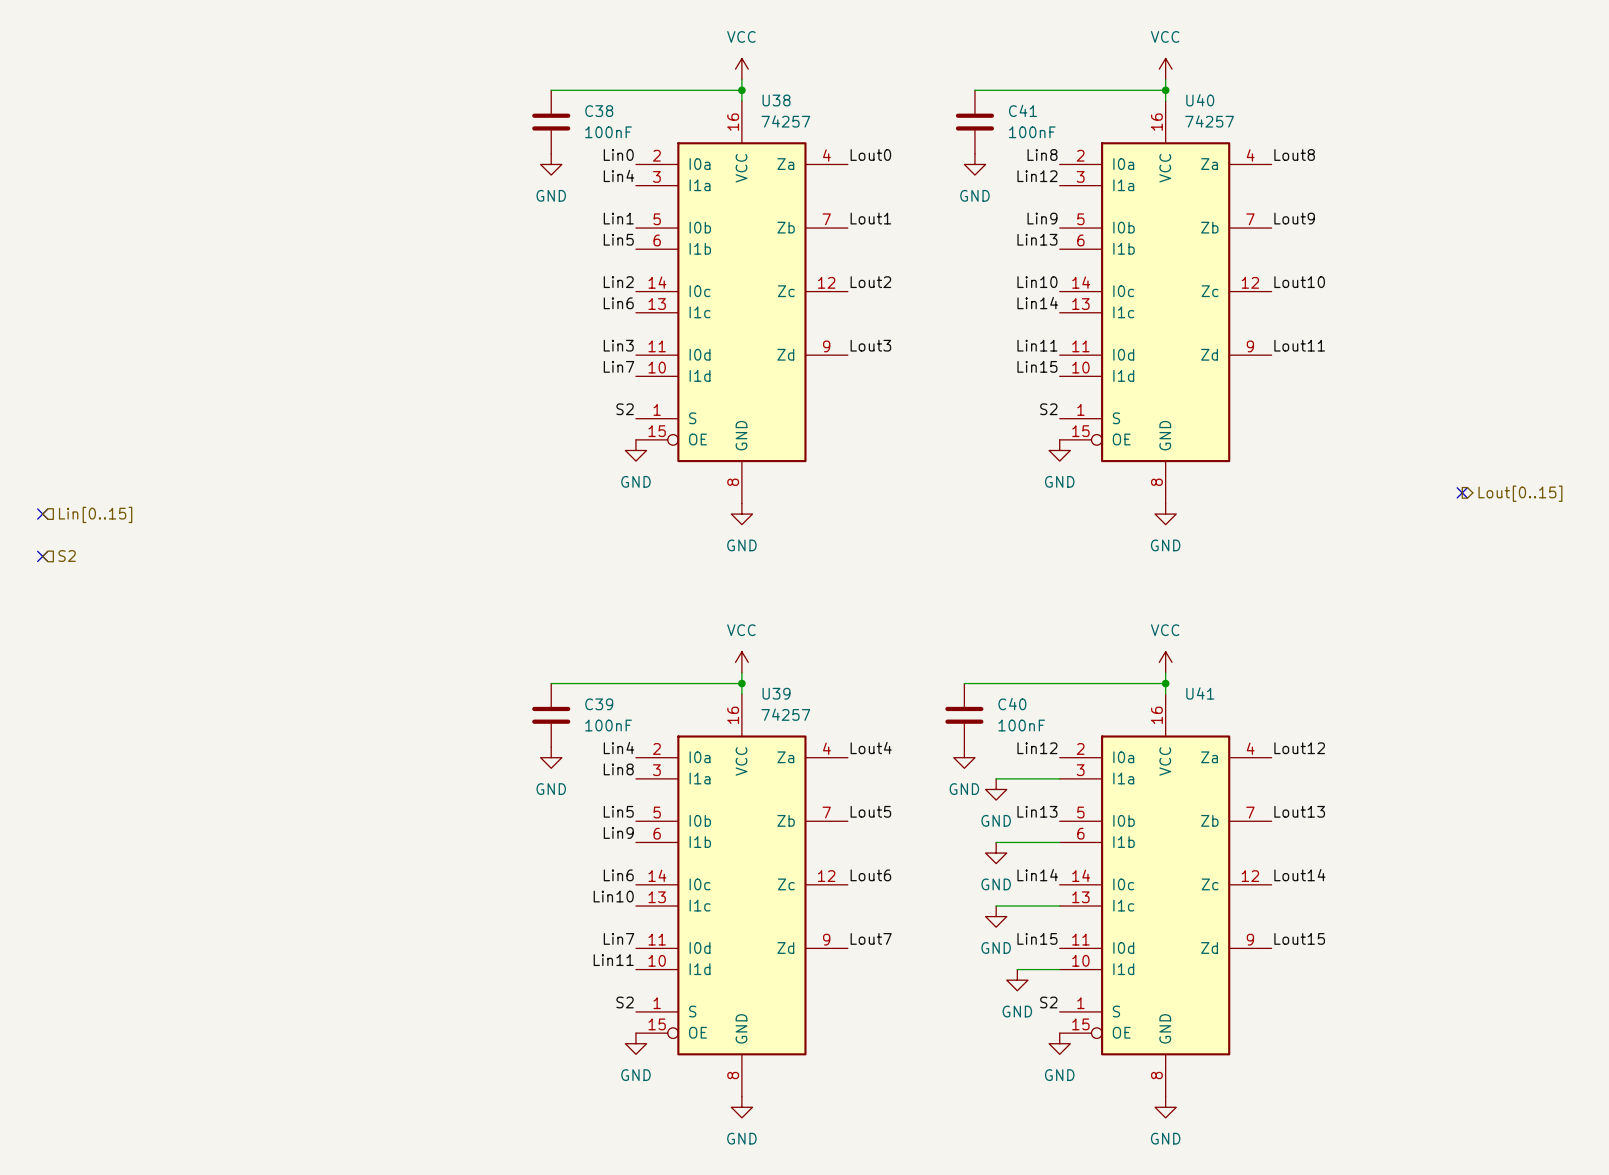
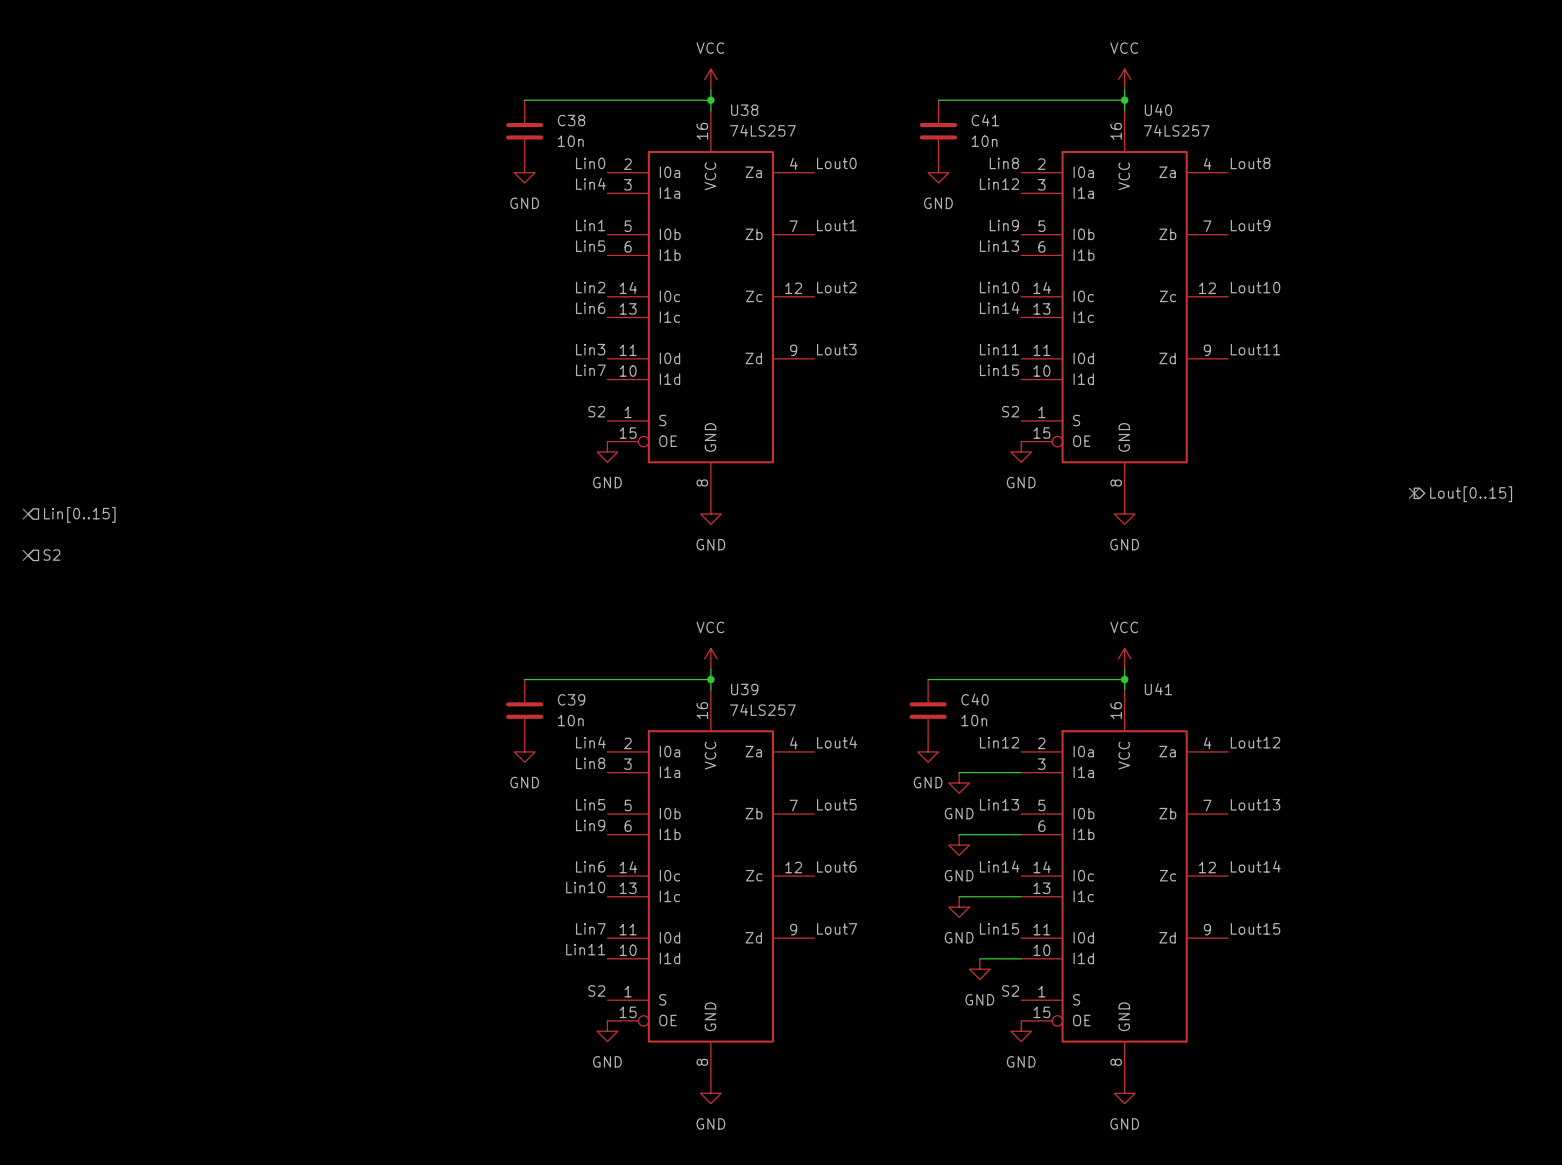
U38 value: 74257 (785, 121) -> 74LS257 (762, 130)
U40 value: 74257 (1209, 121) -> 74LS257 (1176, 130)
C38 value: 100nF (608, 132) -> 10n (570, 141)
C41 value: 100nF (1032, 132) -> 10n (984, 141)
U39 value: 74257 (785, 714) -> 74LS257 (762, 709)
C39 value: 100nF (608, 725) -> 10n (570, 720)
C40 value: 100nF (1021, 725) -> 10n (974, 720)

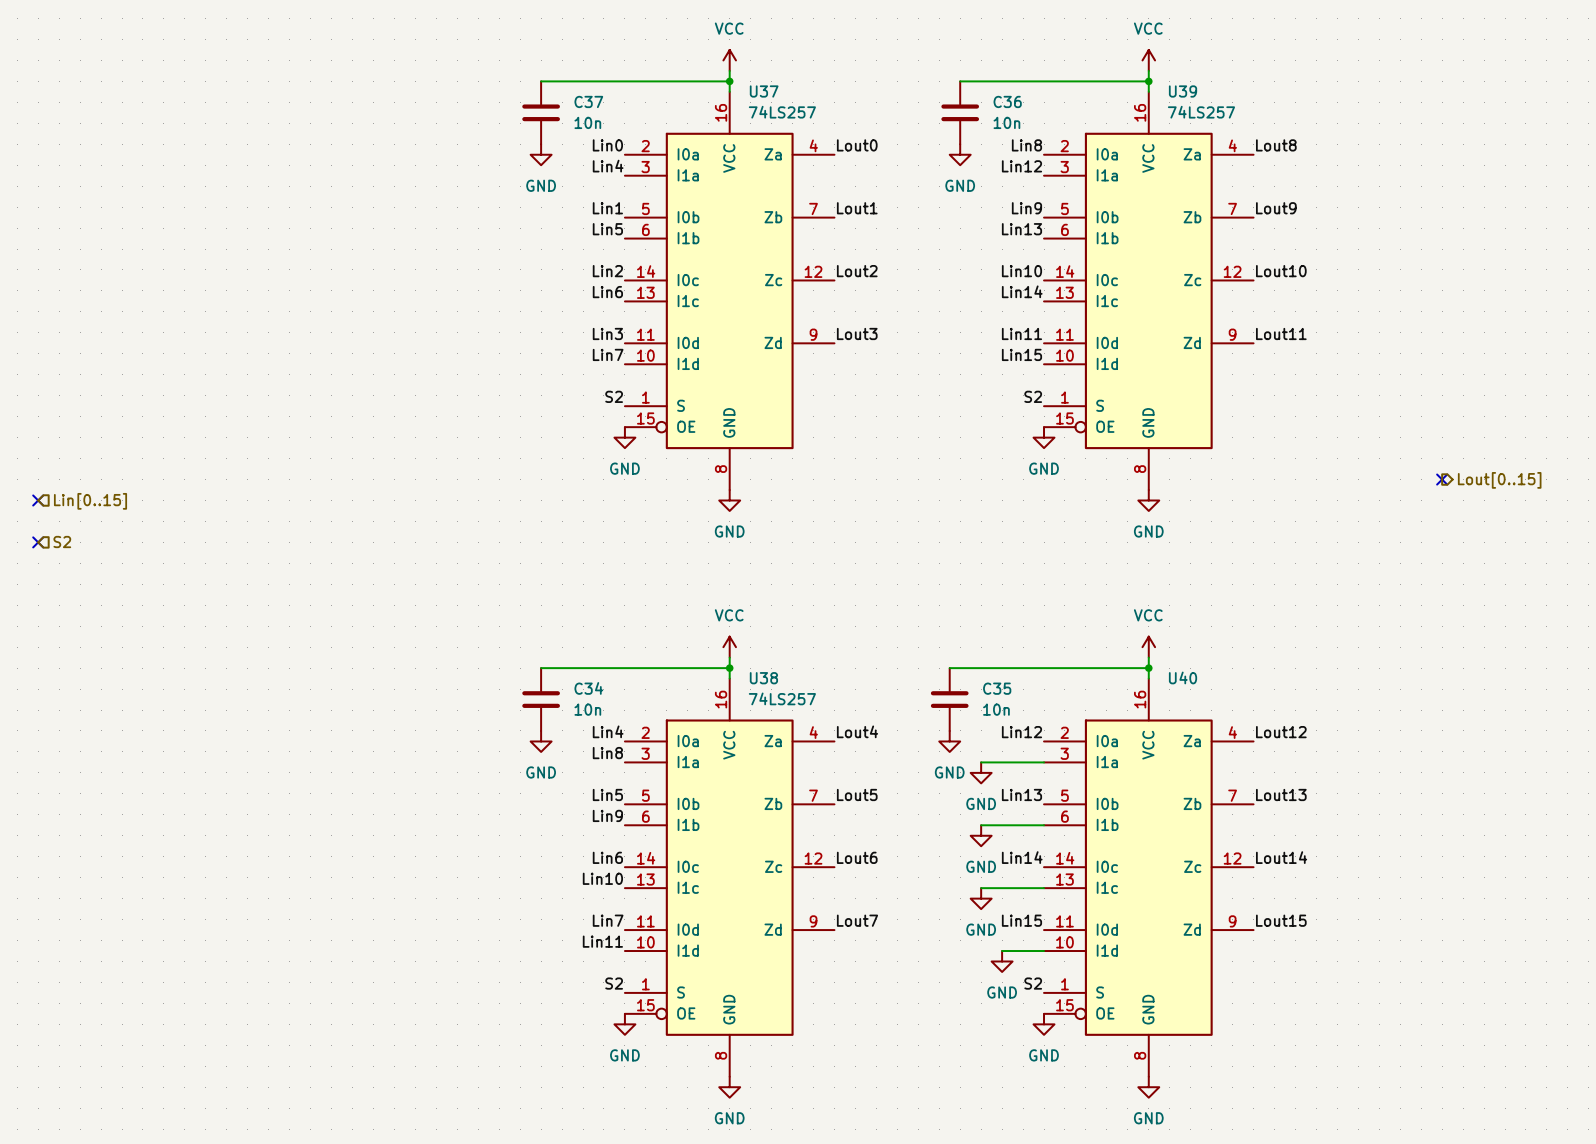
U40 name: U40 (1158, 109) -> U39 (1183, 91)
U38 name: U38 (744, 110) -> U37 (764, 91)
C38 name: C38 (571, 120) -> C37 (588, 101)
C41 name: C41 (985, 120) -> C36 (1007, 101)
U39 name: U39 (744, 689) -> U38 (763, 678)
U41 name: U41 (1158, 689) -> U40 (1183, 677)
C39 name: C39 (571, 699) -> C34 (588, 688)
C40 name: C40 (974, 699) -> C35 (997, 688)

